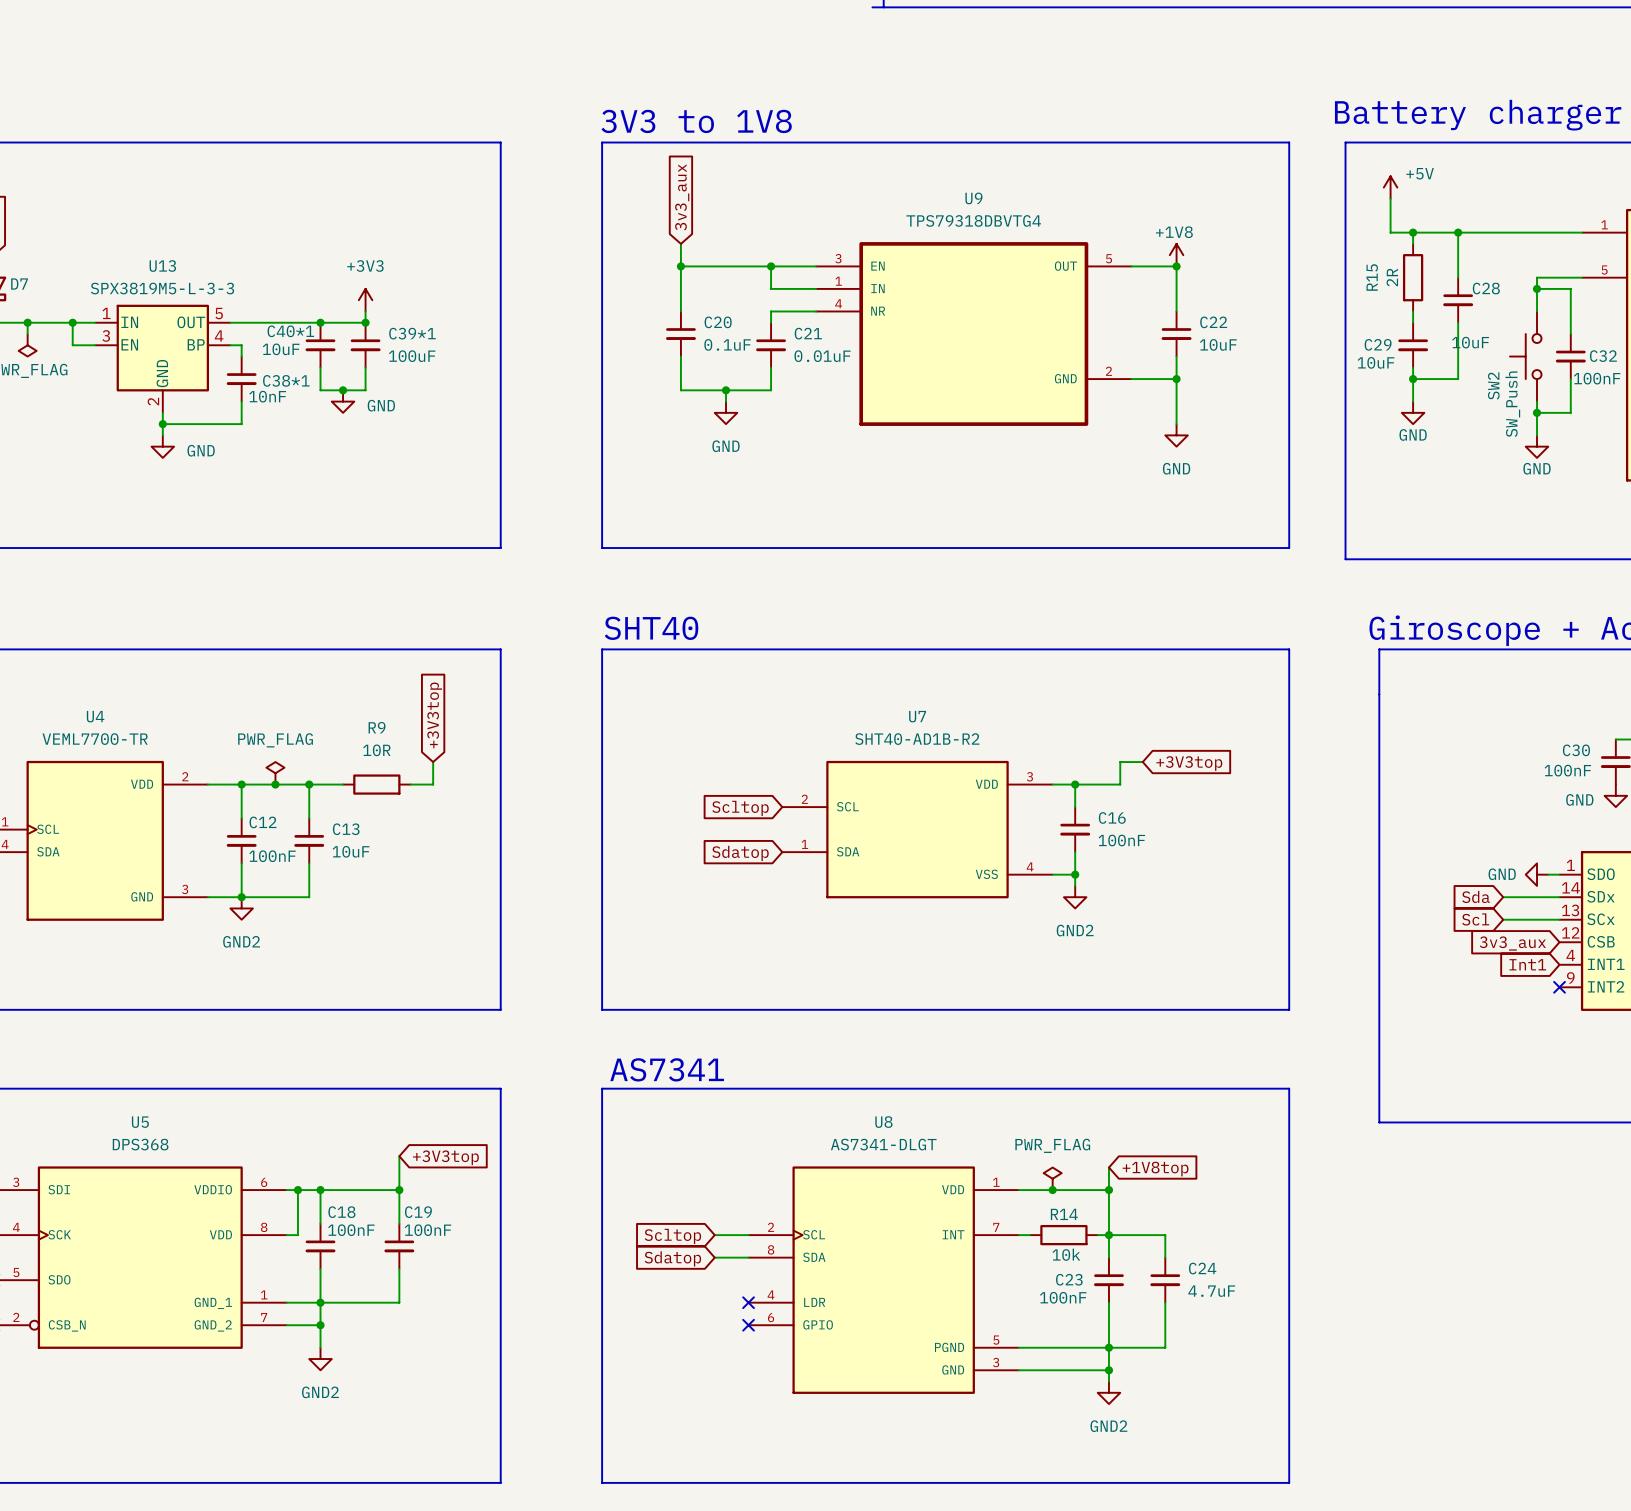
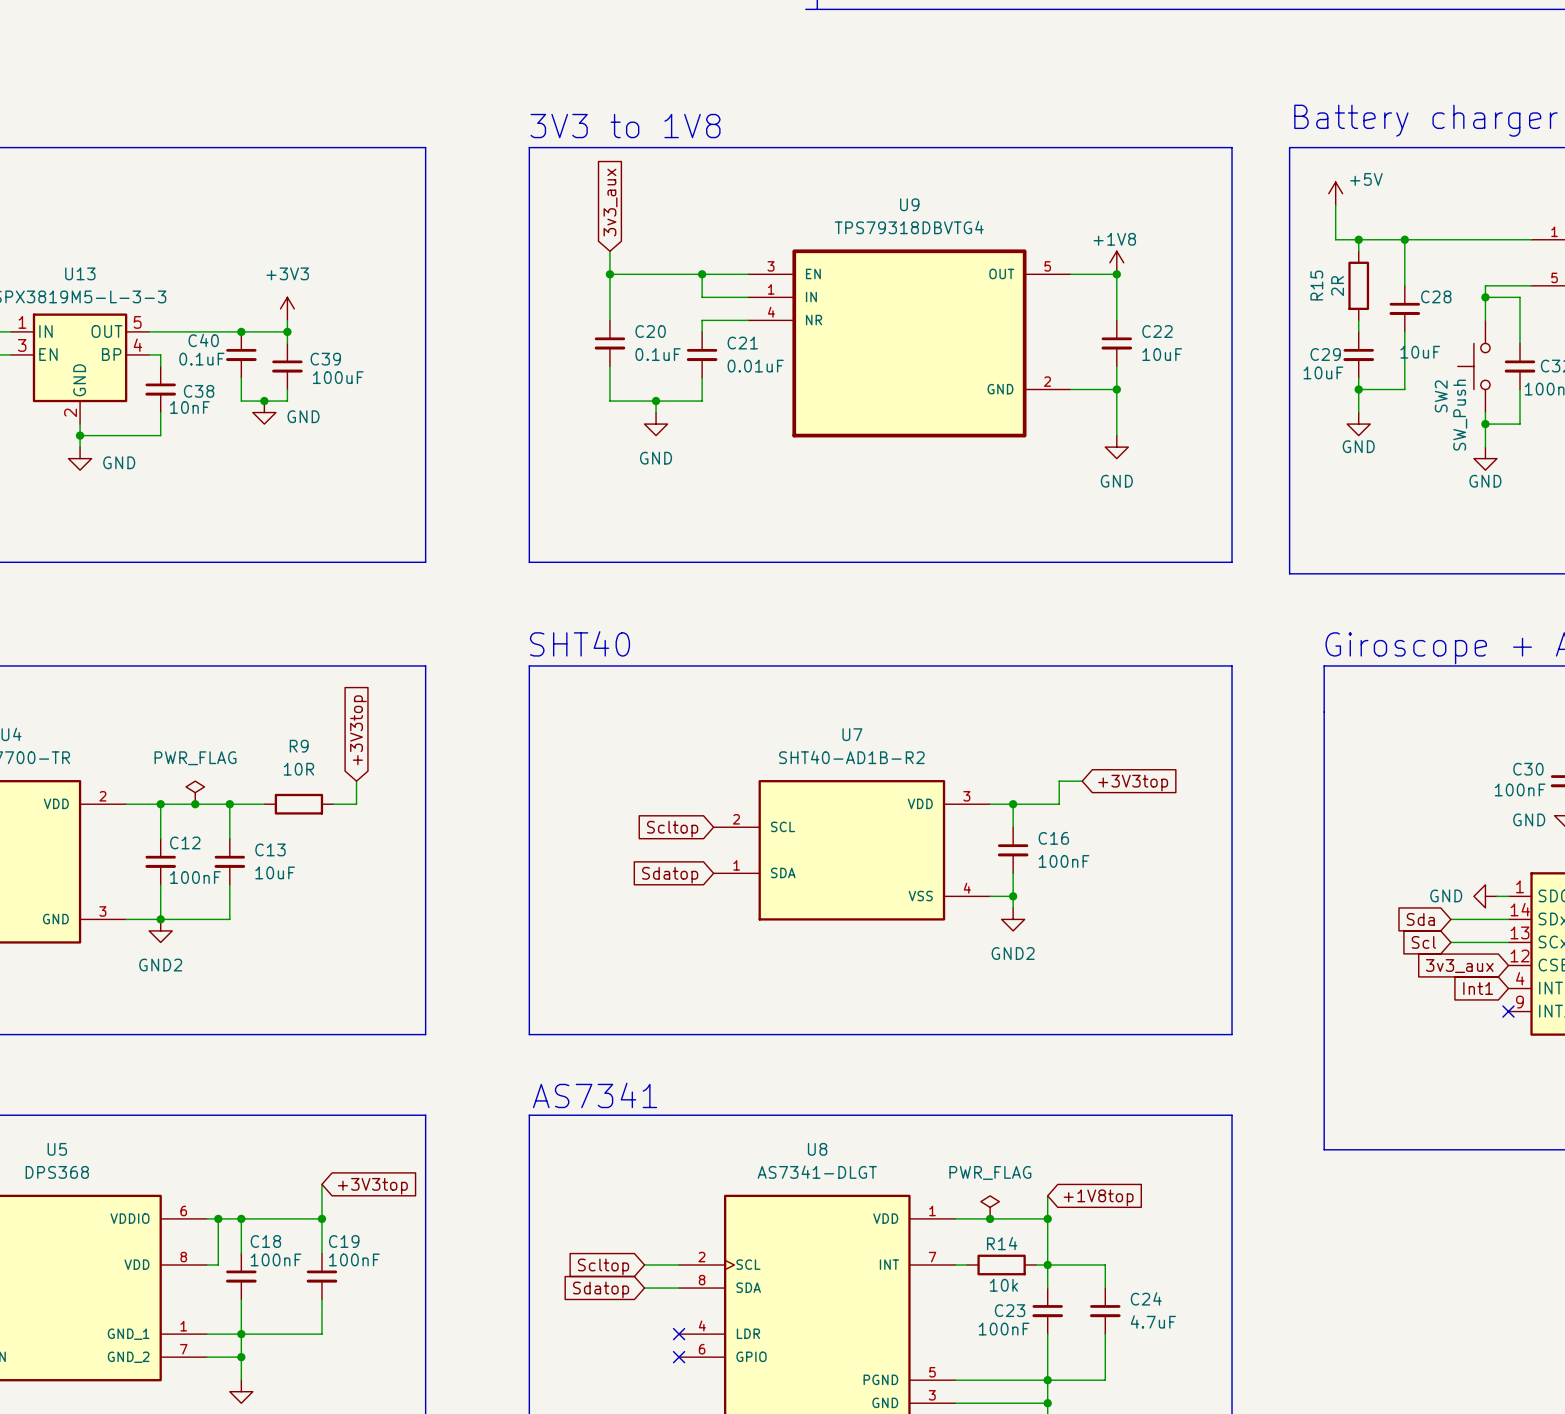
C40*1 name: C40*1 (290, 331) -> C40 (203, 340)
C39*1: 100uF (365, 345) -> none
C40*1 value: 10uF (281, 349) -> 0.1uF (201, 359)
C39: none -> 100uF (287, 366)
C38*1 name: C38*1 (286, 380) -> C38 (199, 391)

